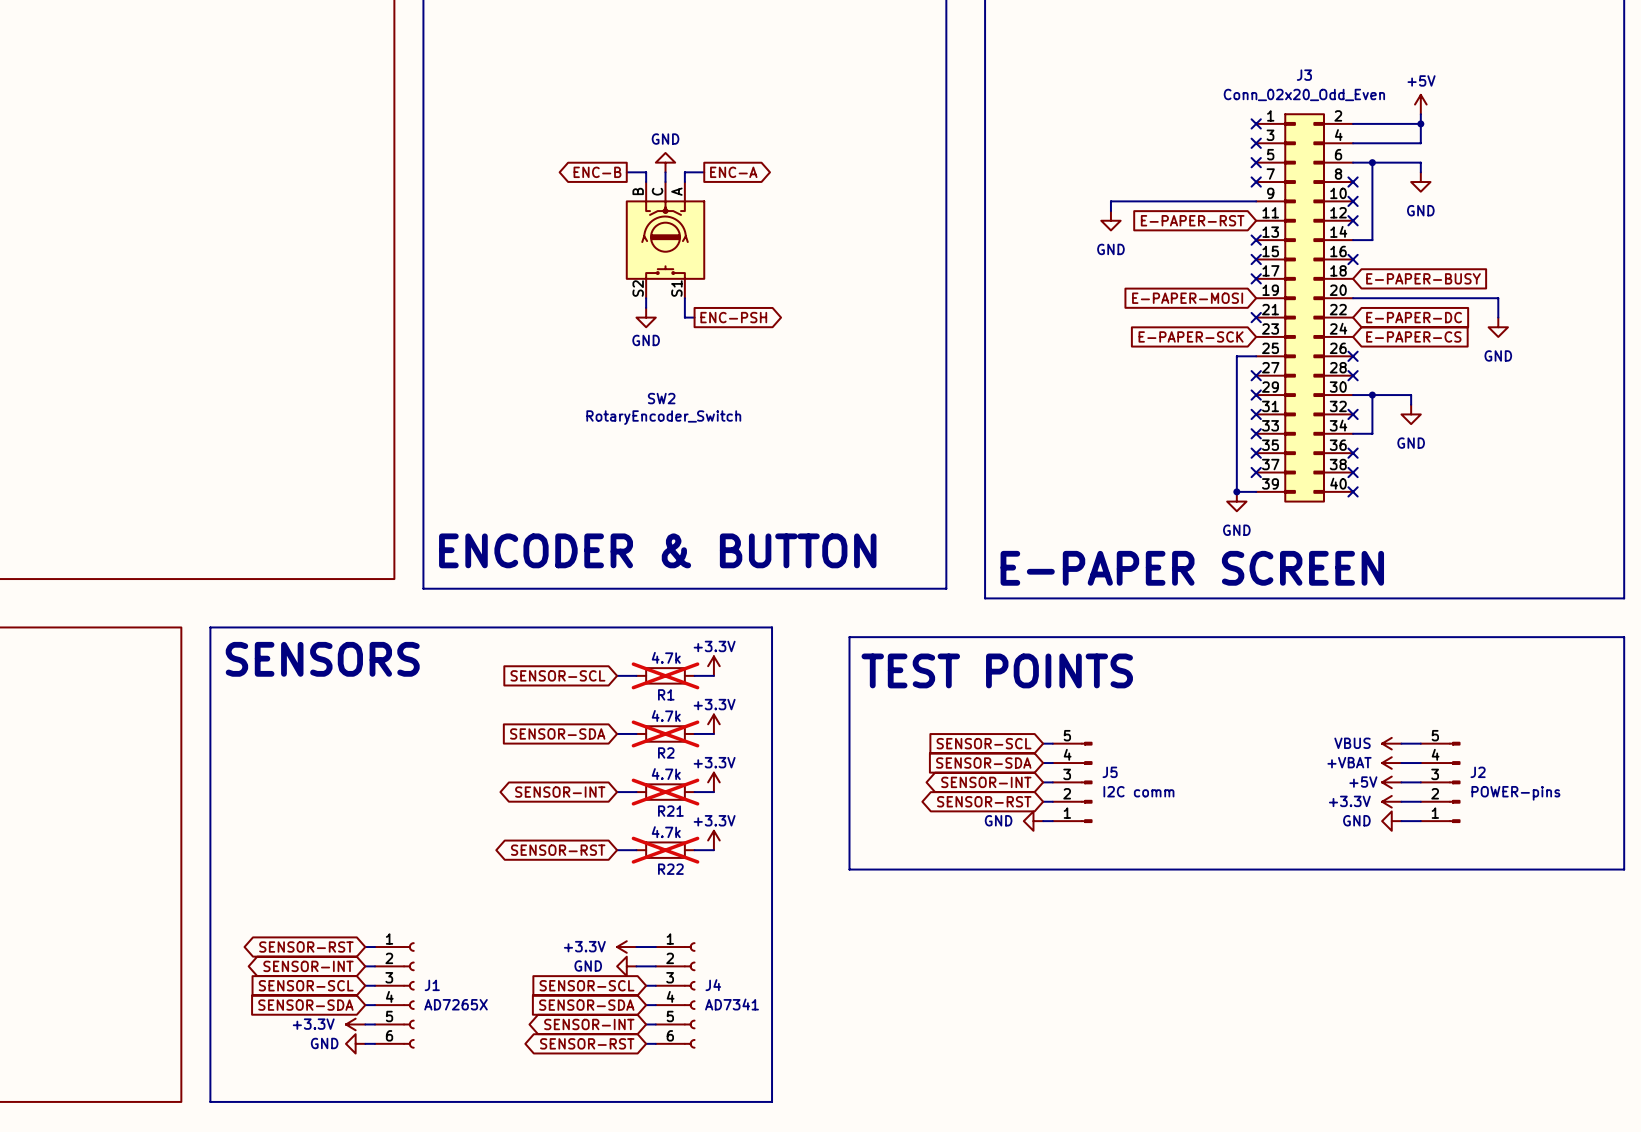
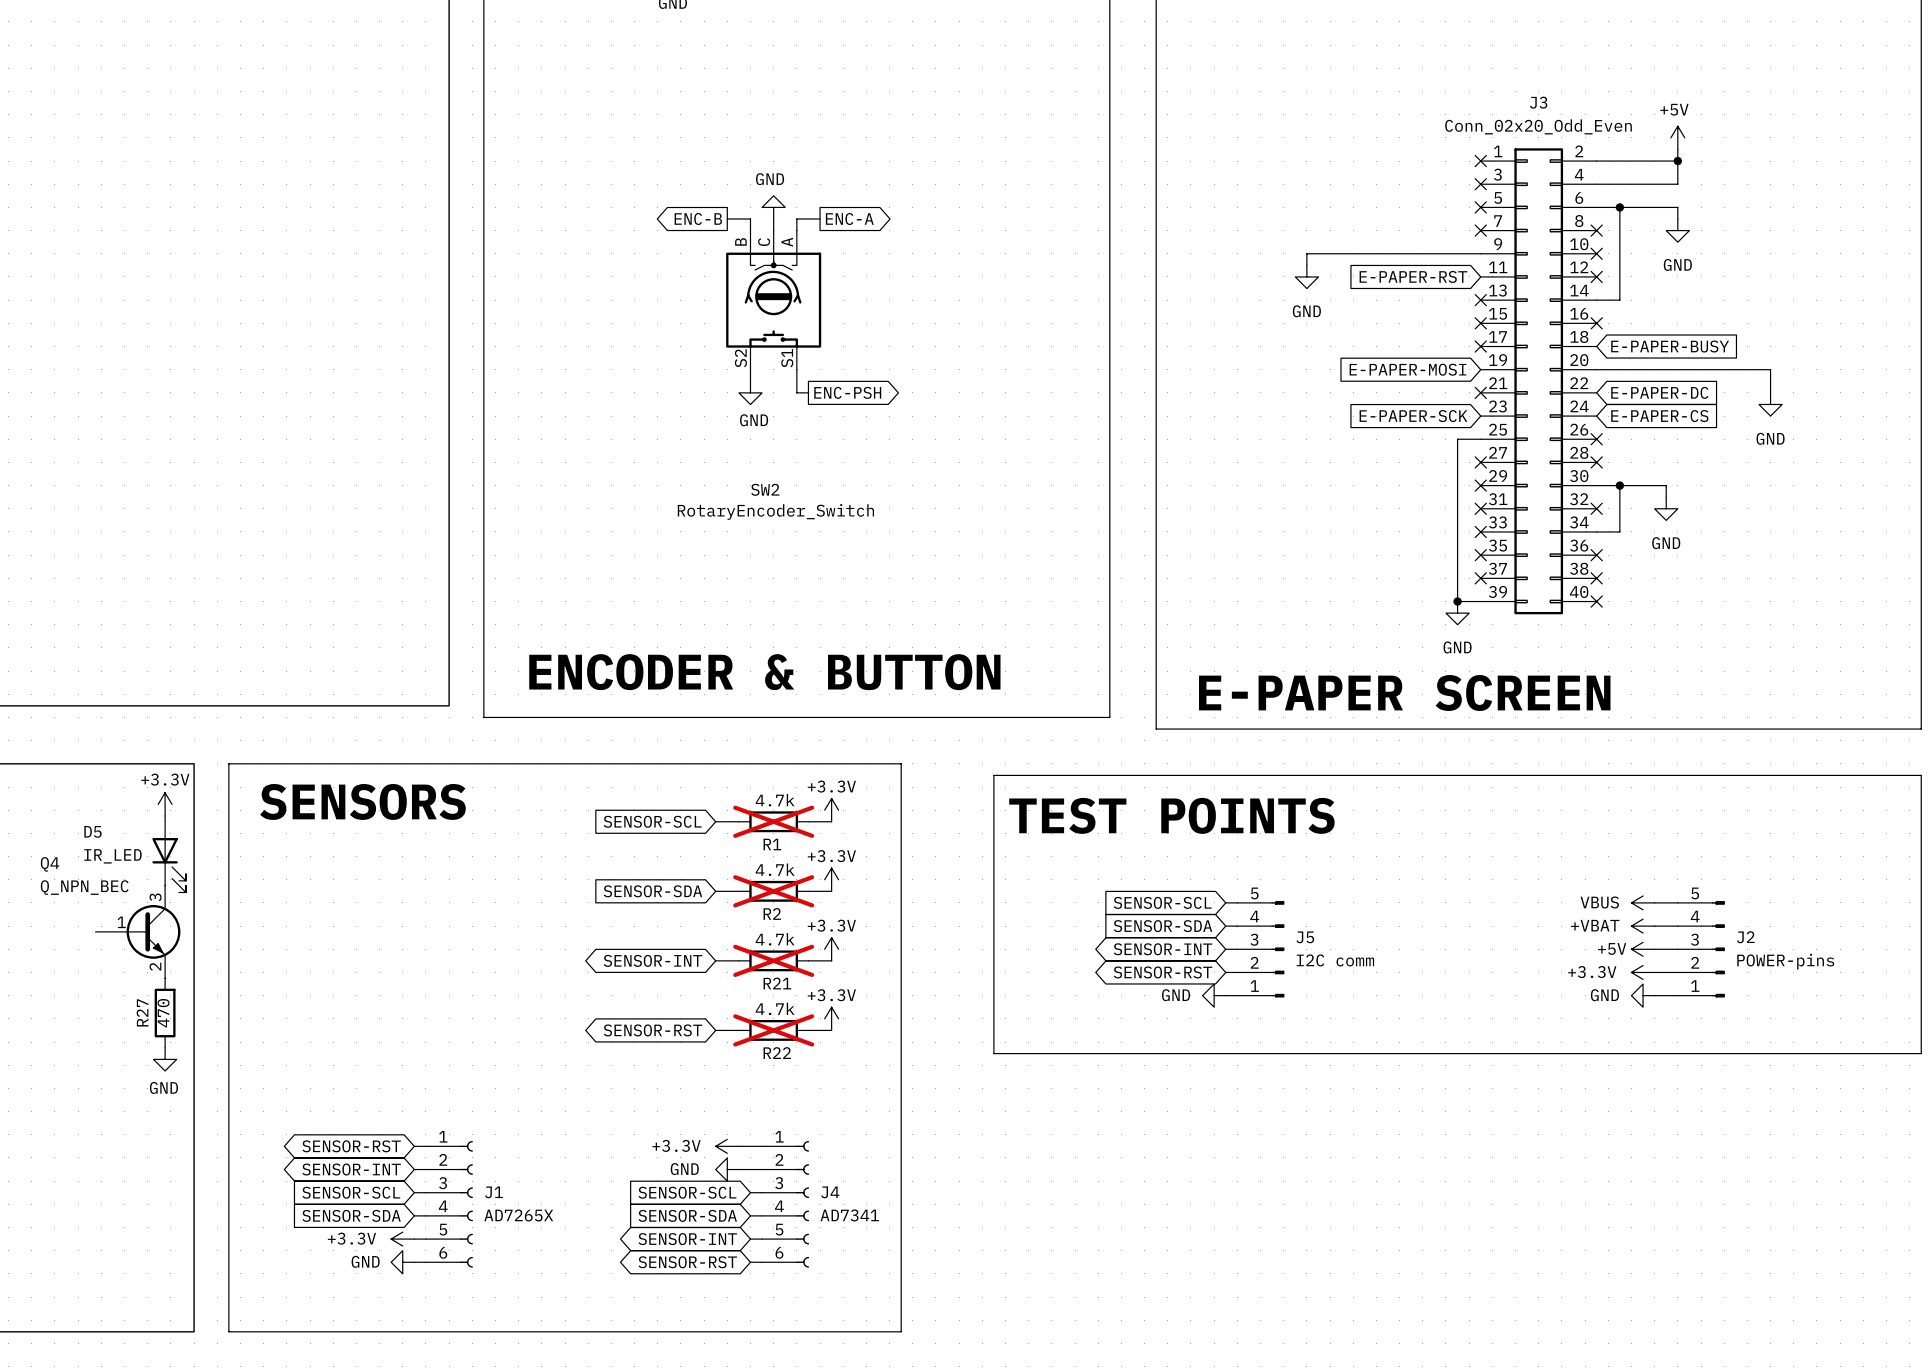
power symbol: none -> +3.3V (165, 804)
D5: none -> IR_LED (169, 854)
Q4: none -> Q_NPN_BEC (137, 931)
R27: none -> 470 (165, 1013)
power symbol: none -> GND (165, 1059)

